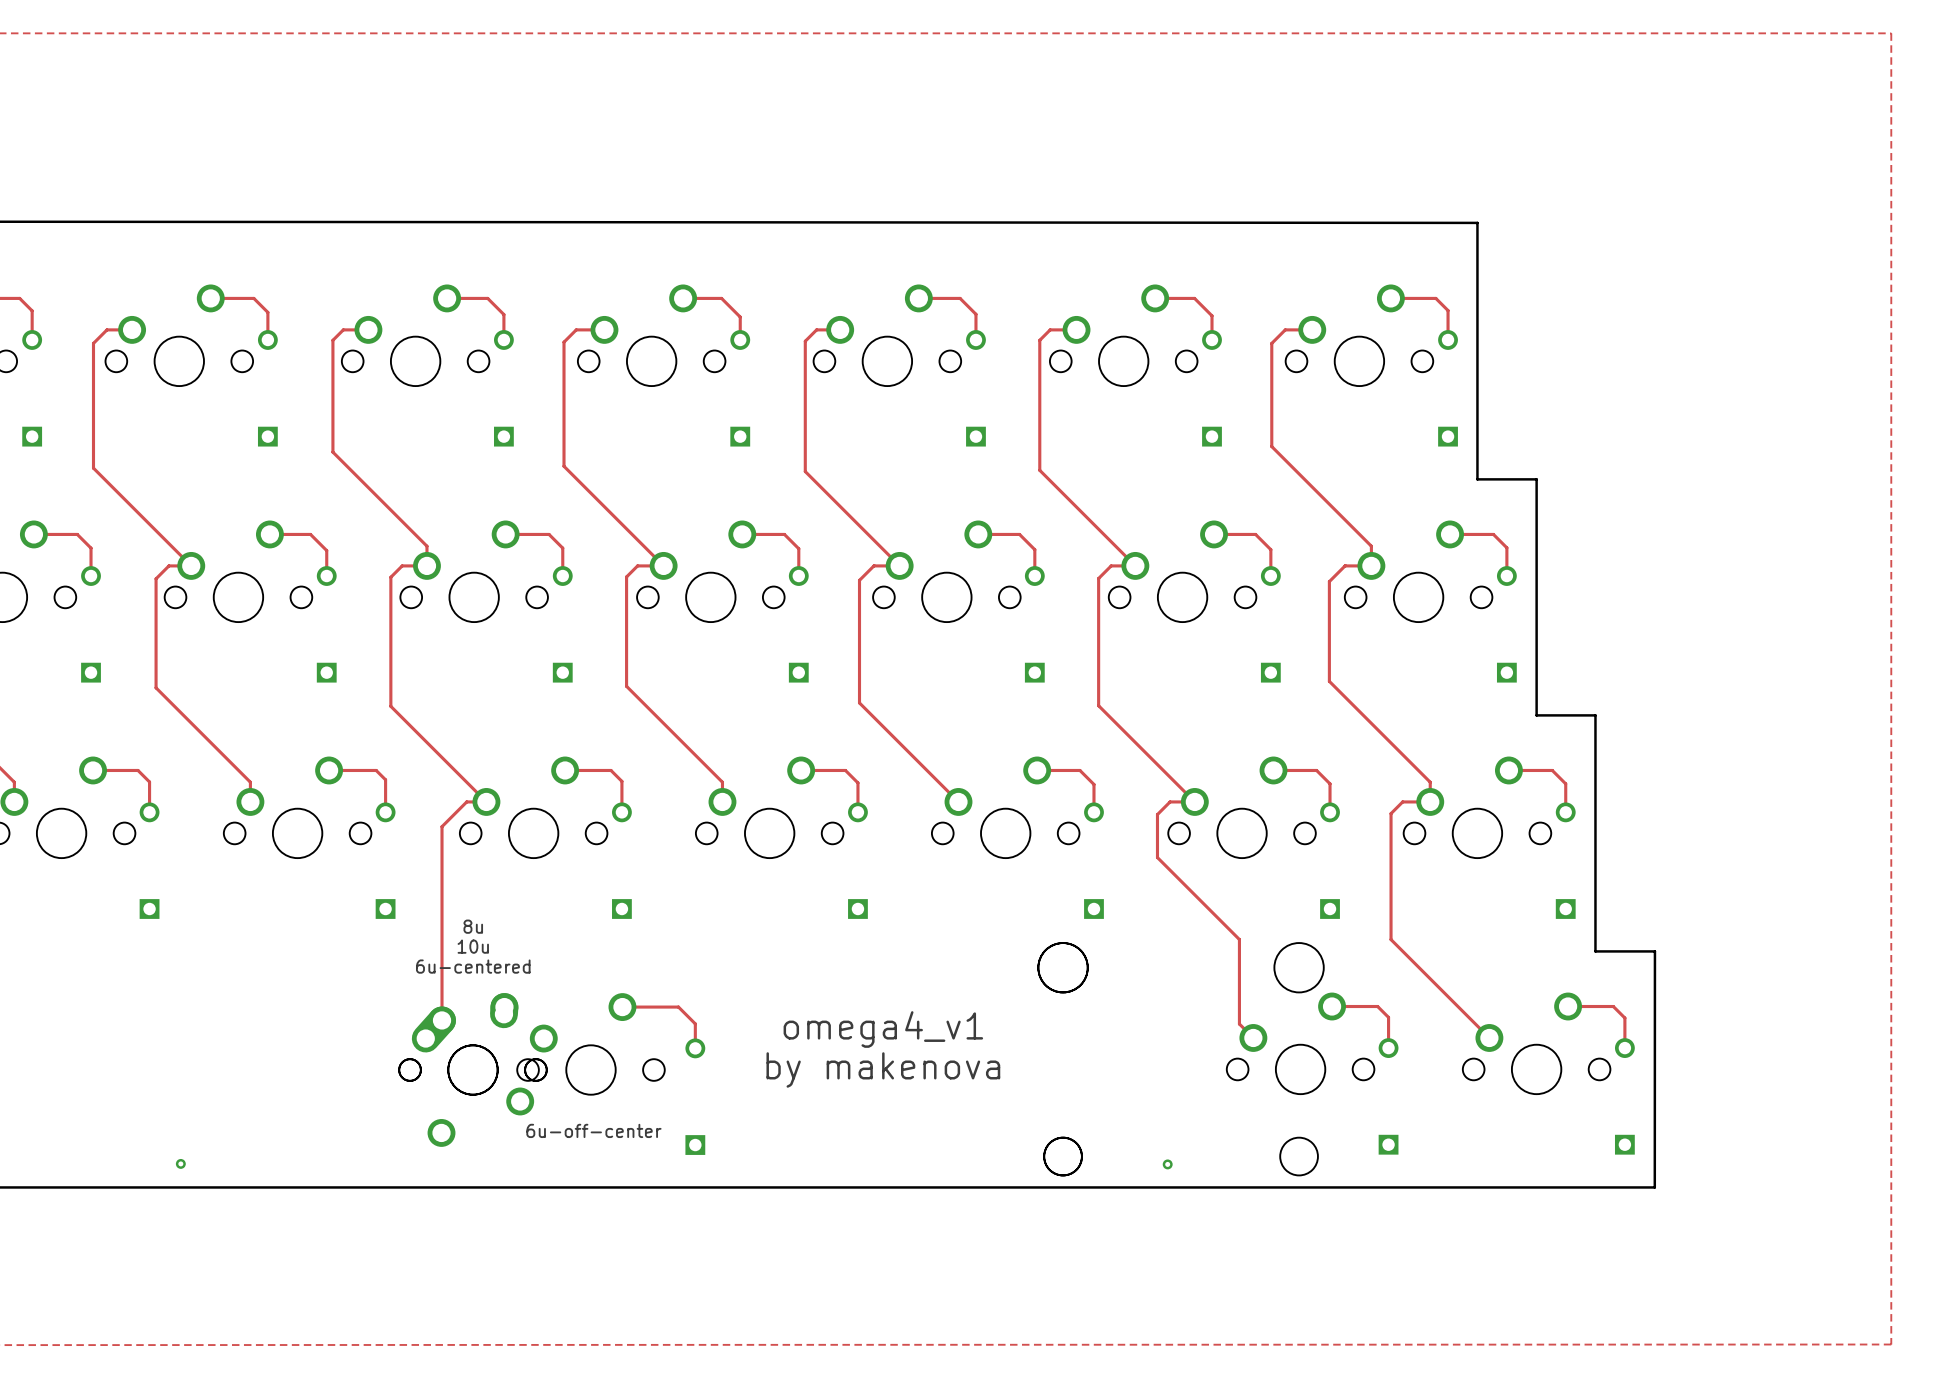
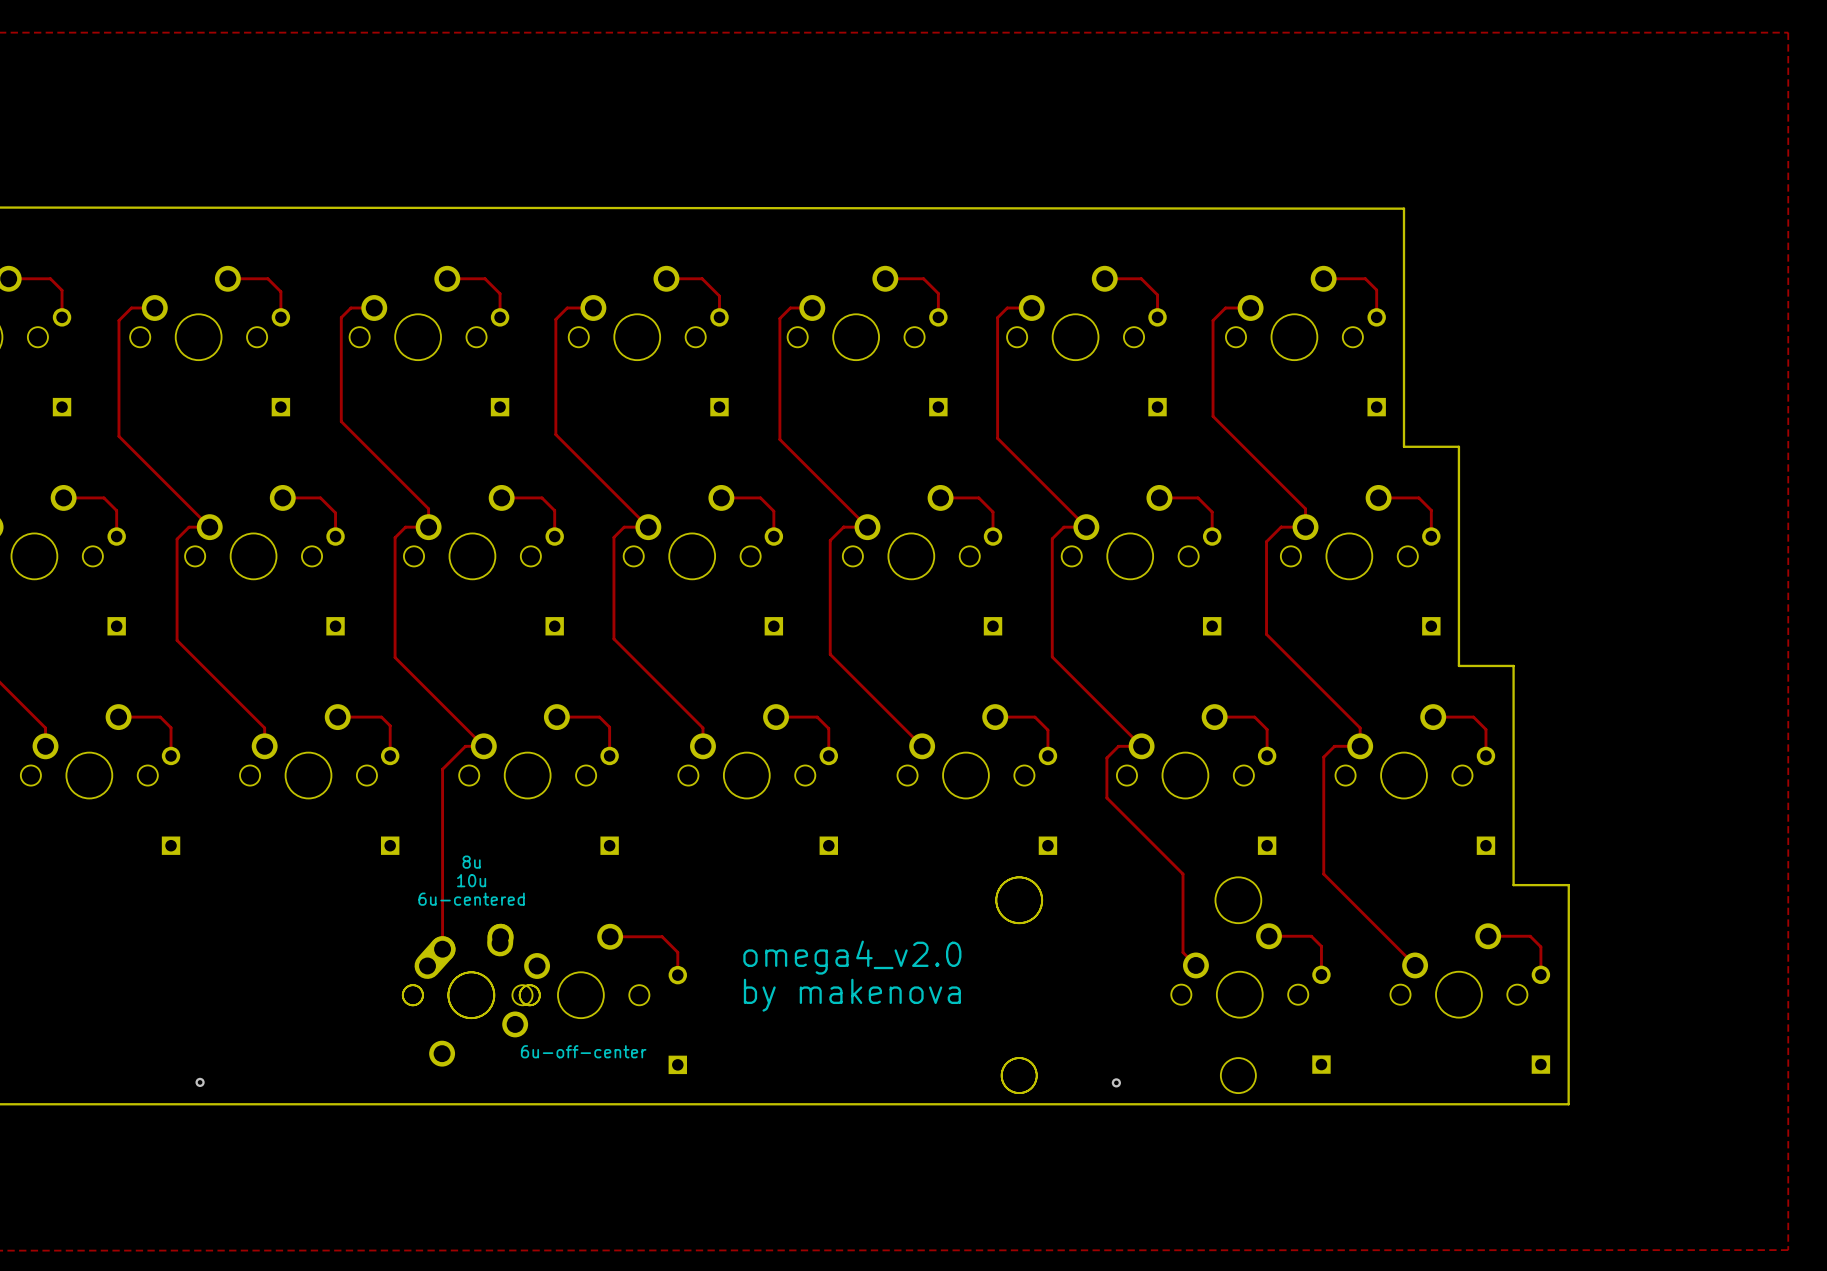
text: omega4_v1 (883, 1029) -> omega4_v2.0 (852, 957)

